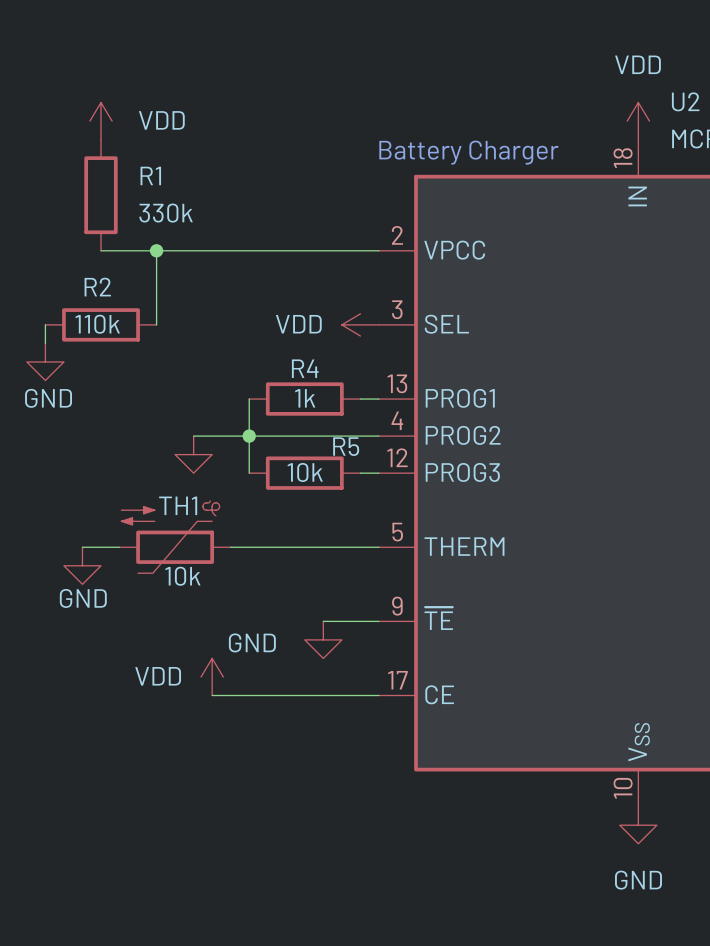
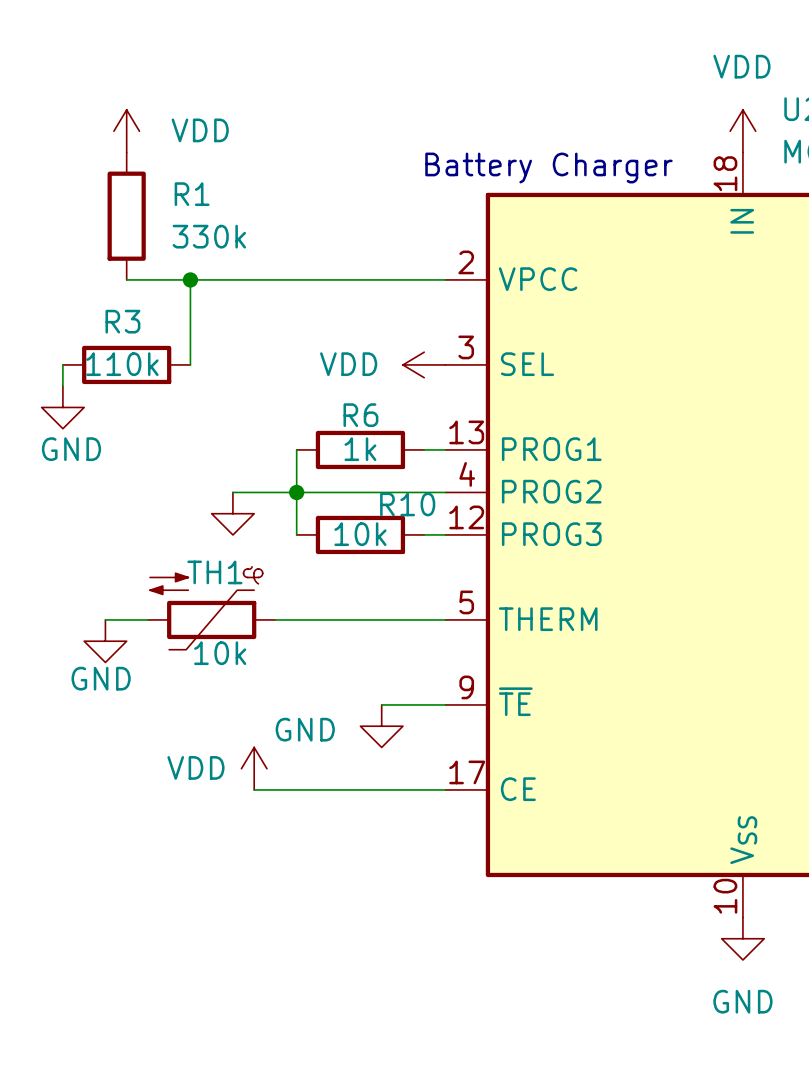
R2 name: R2 (97, 287) -> R3 (122, 321)
R4 name: R4 (305, 368) -> R6 (360, 415)
R5 name: R5 (346, 446) -> R10 (407, 504)

